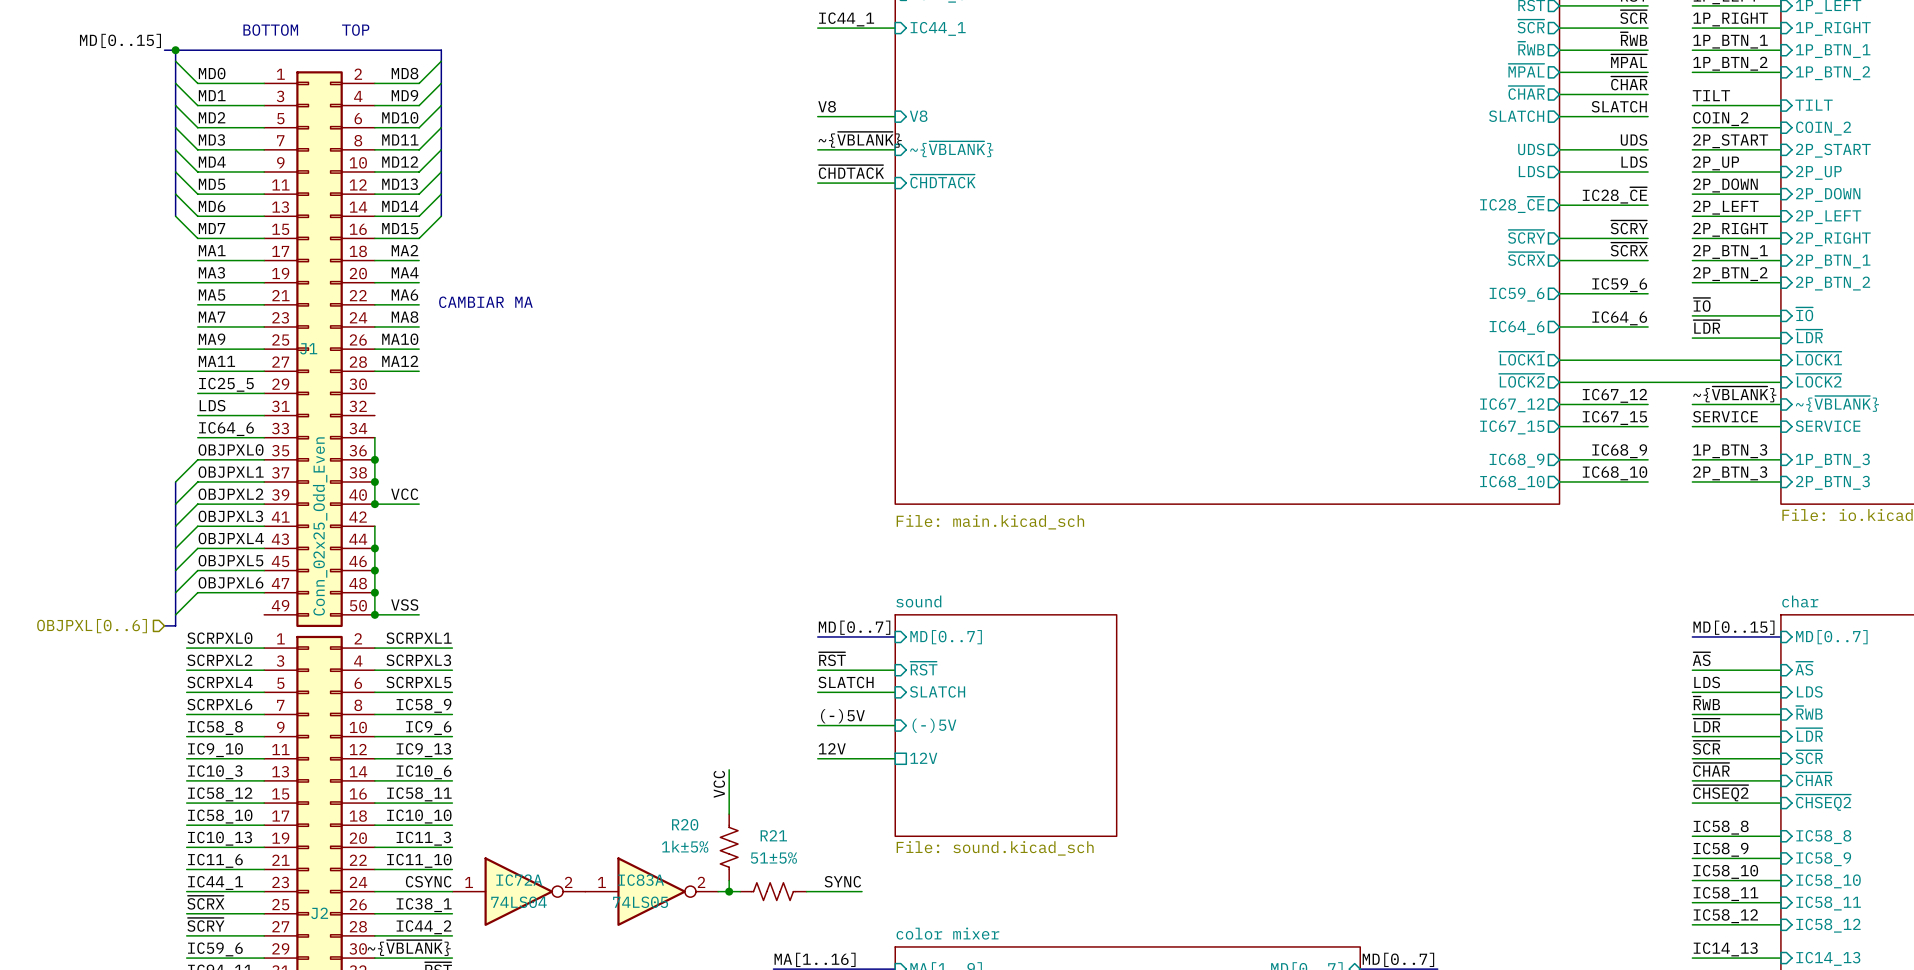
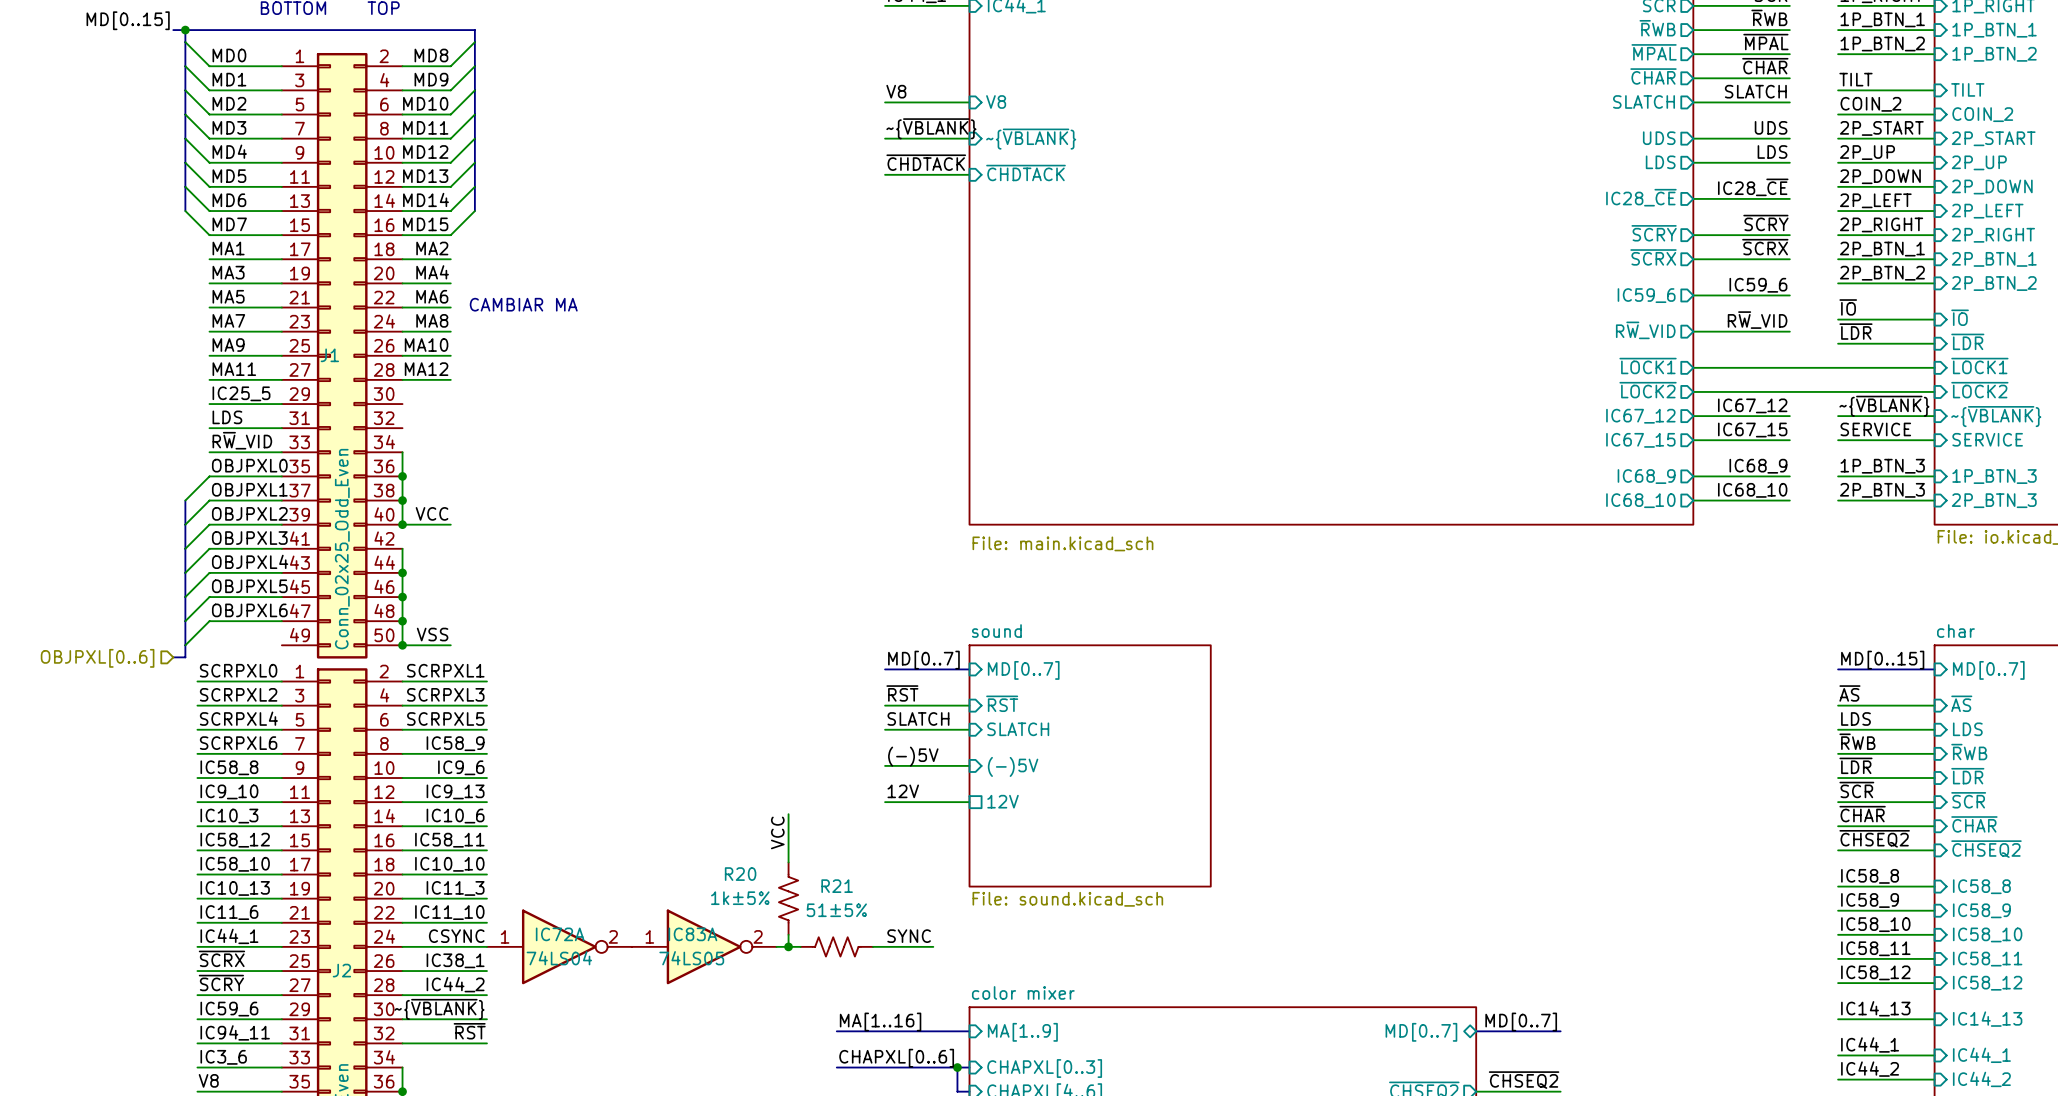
label: IC64_6 (1619, 318) -> R~{W}_VID (1757, 320)
sheet pin: IC64_6 (1517, 327) -> R~{W}_VID (1645, 330)
label: IC64_6 (226, 429) -> R~{W}_VID (242, 440)

